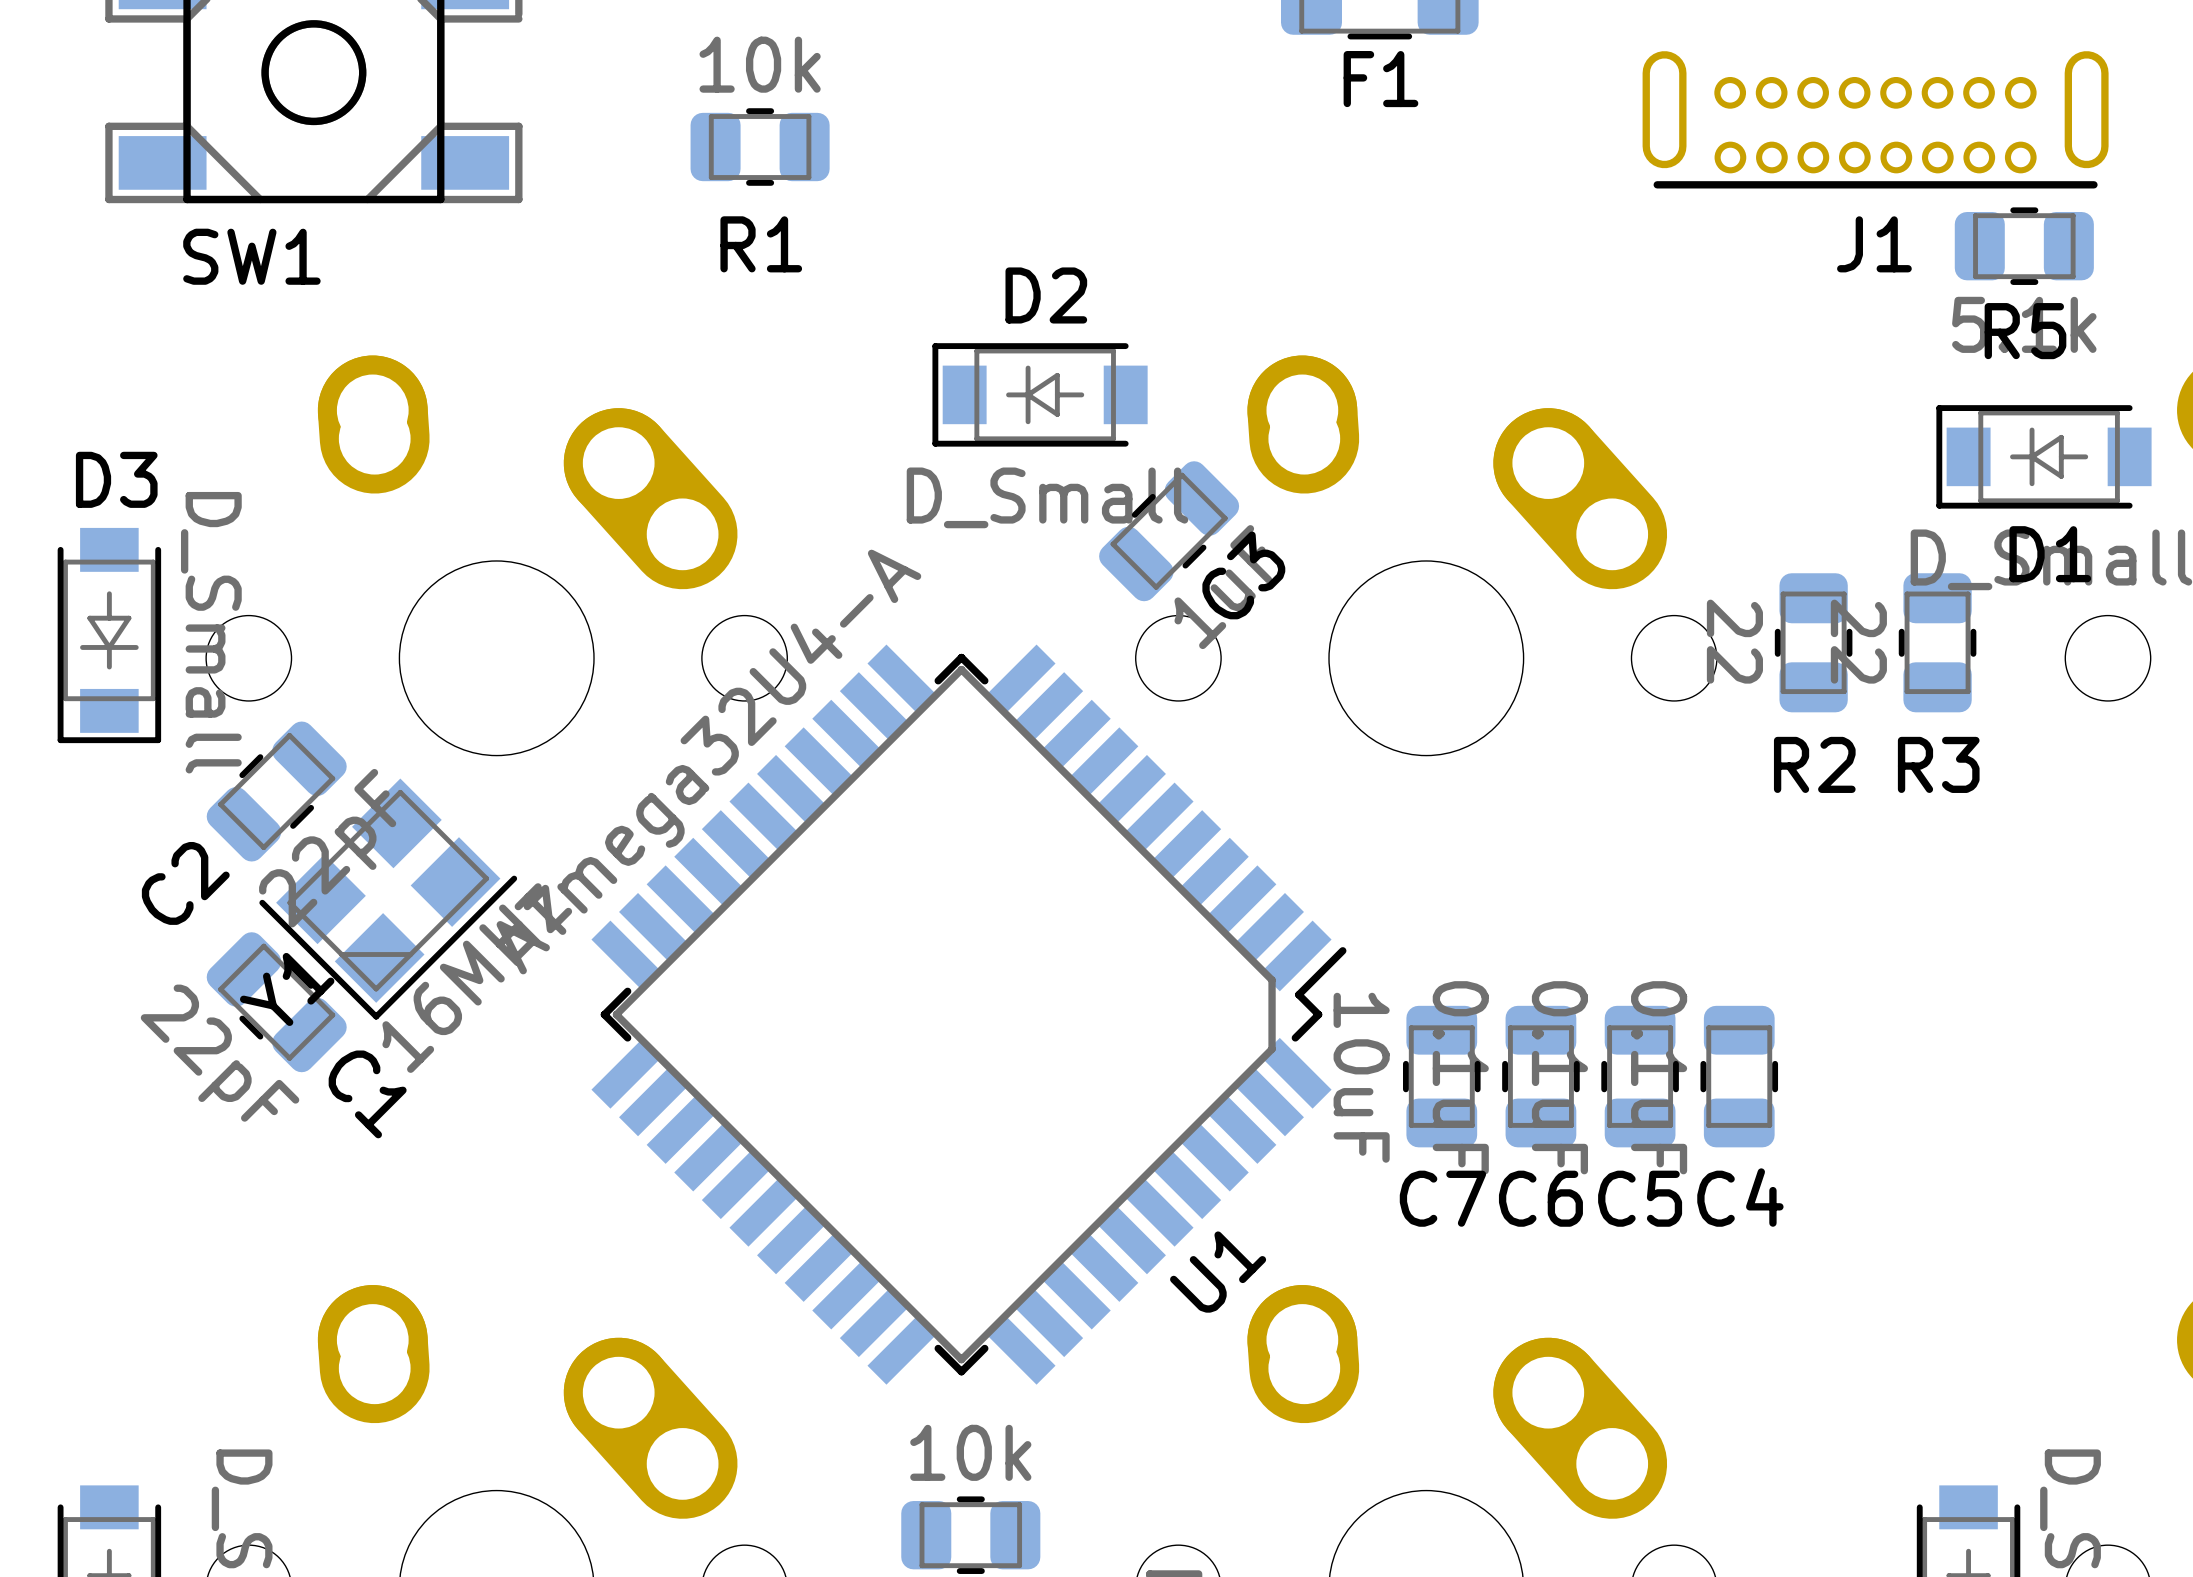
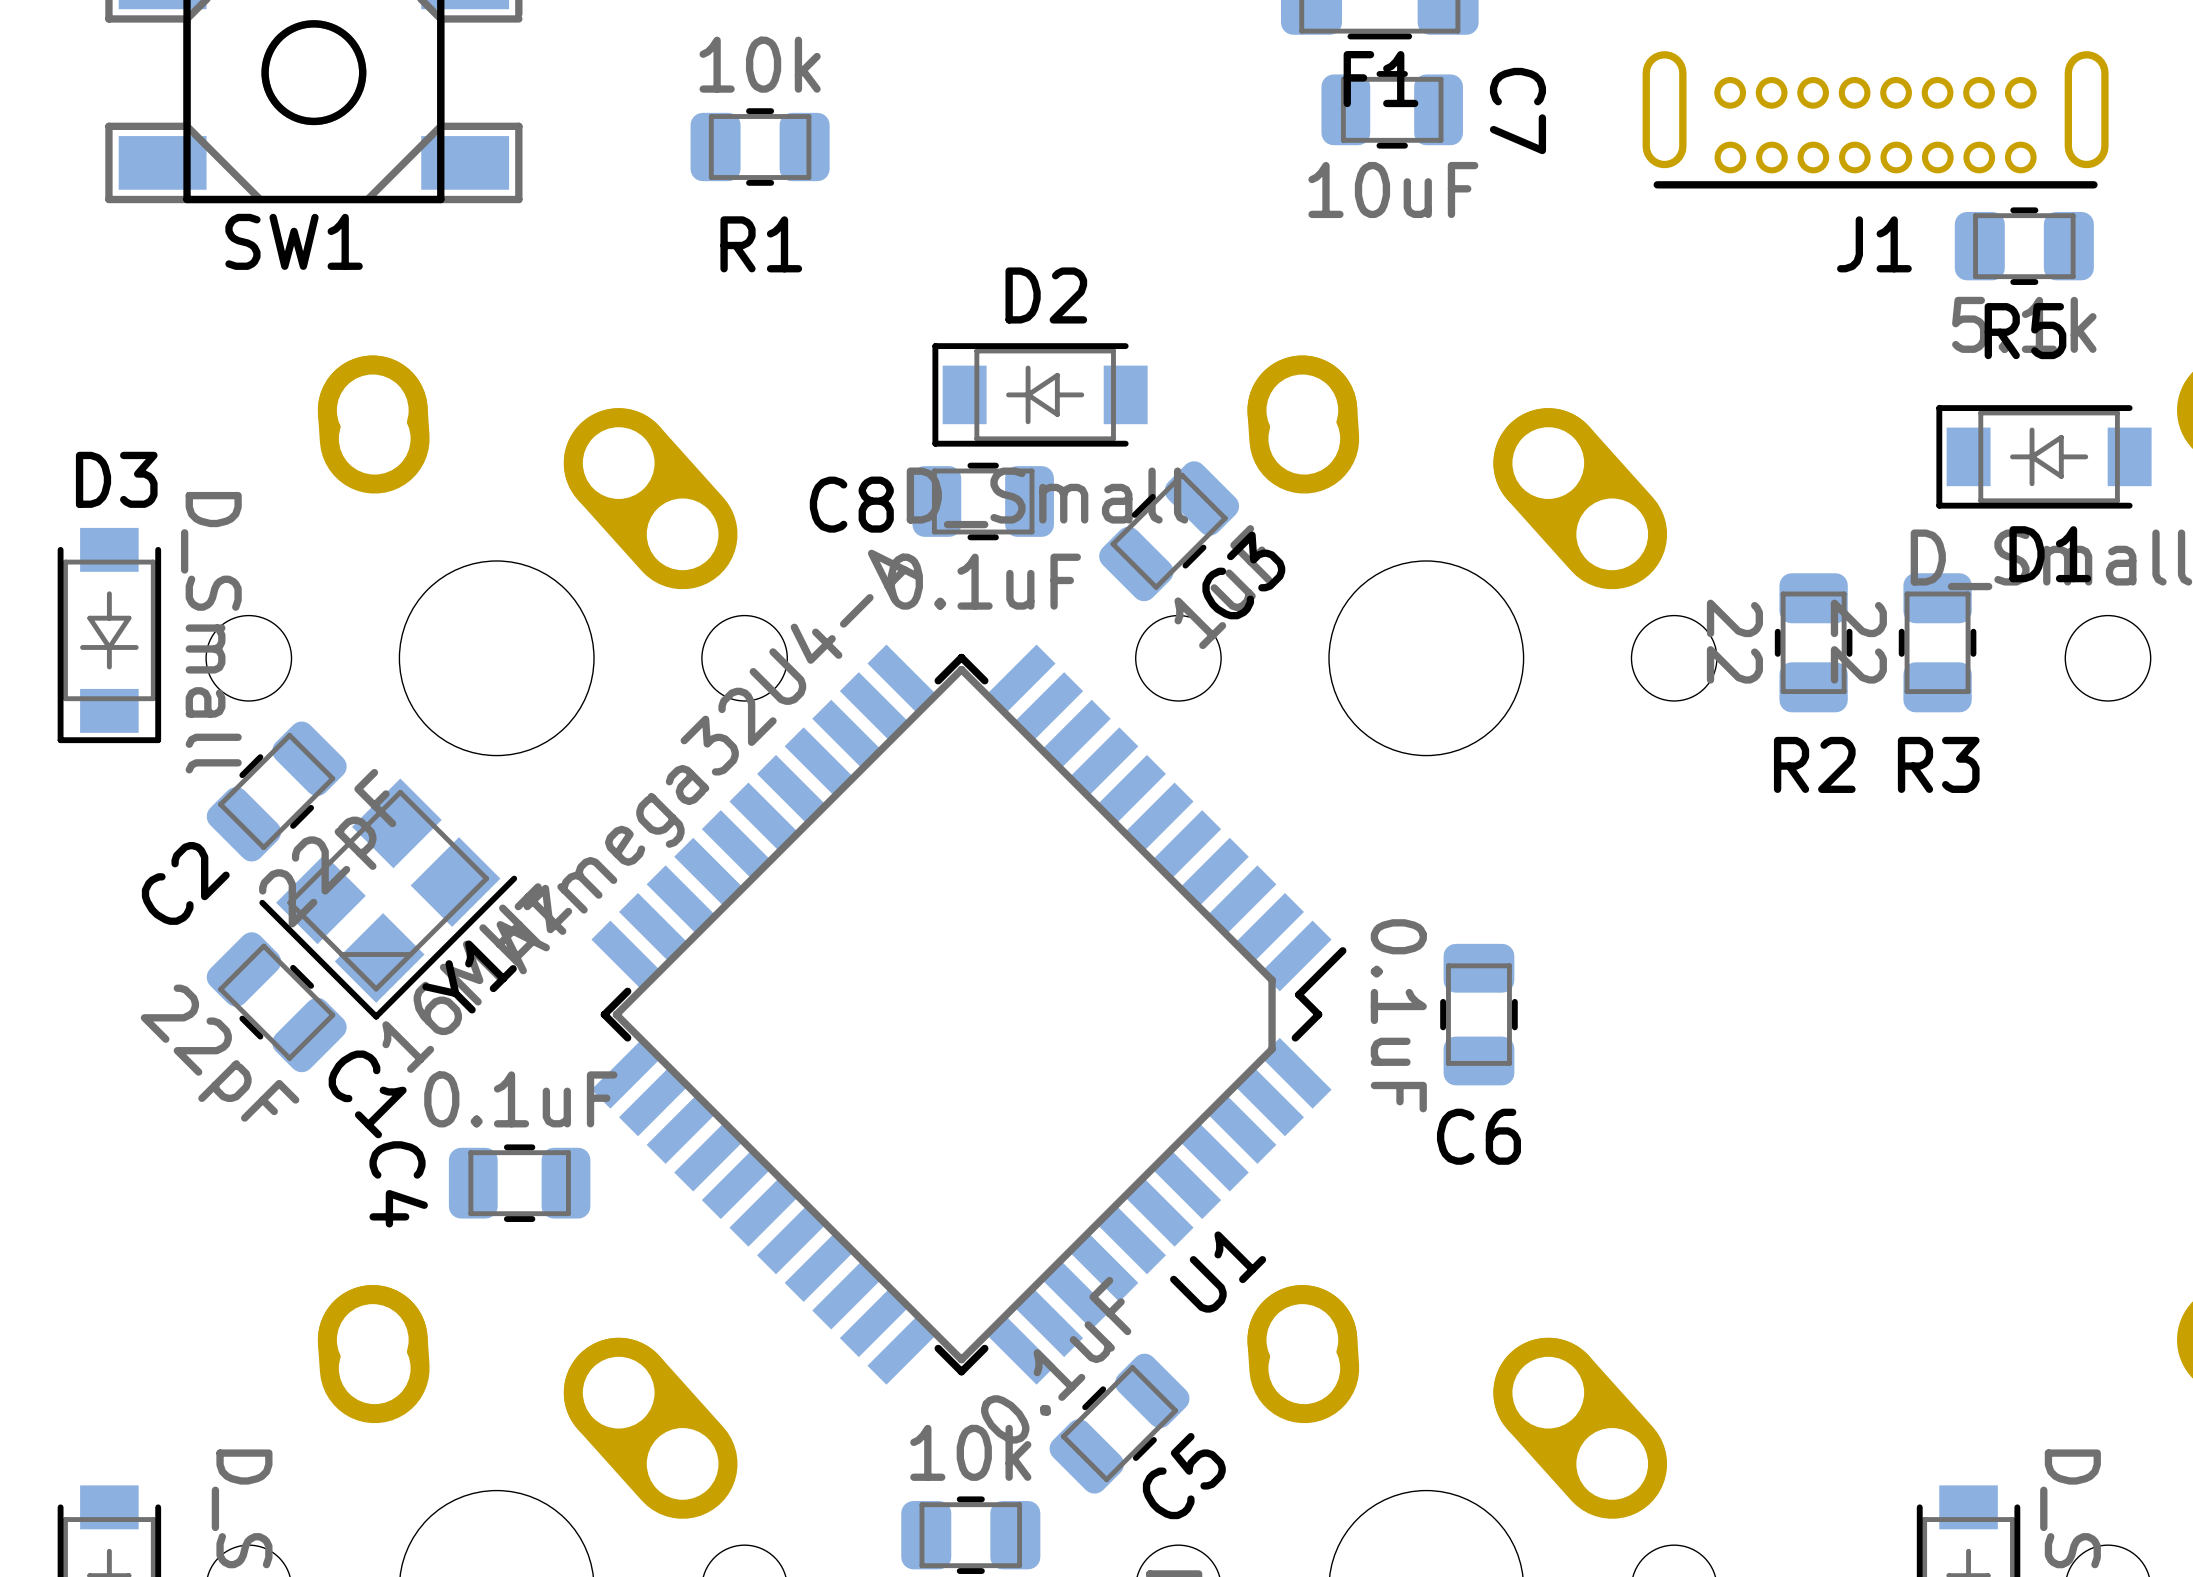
SW1 name position: SW1 (251, 256) -> SW1 (294, 241)
C8: none -> 0.1uF (983, 501)
Y1 name position: Y1 (287, 989) -> Y1 (469, 976)
C7 rotation: 0° (1441, 1076) -> 90° clockwise (1392, 109)
C7 position: (1441, 1076) -> (1392, 109)
C6 position: (1540, 1076) -> (1478, 1014)
C5 rotation: 0° (1640, 1076) -> 45° clockwise (1119, 1423)
C5 position: (1640, 1076) -> (1119, 1423)
C4 rotation: 0° (1739, 1076) -> 90° clockwise (519, 1183)
C4 position: (1739, 1076) -> (519, 1183)
C7 value position: 10uF (1361, 1077) -> 10uF (1393, 189)
C7 name position: C7 (1442, 1198) -> C7 (1517, 110)

